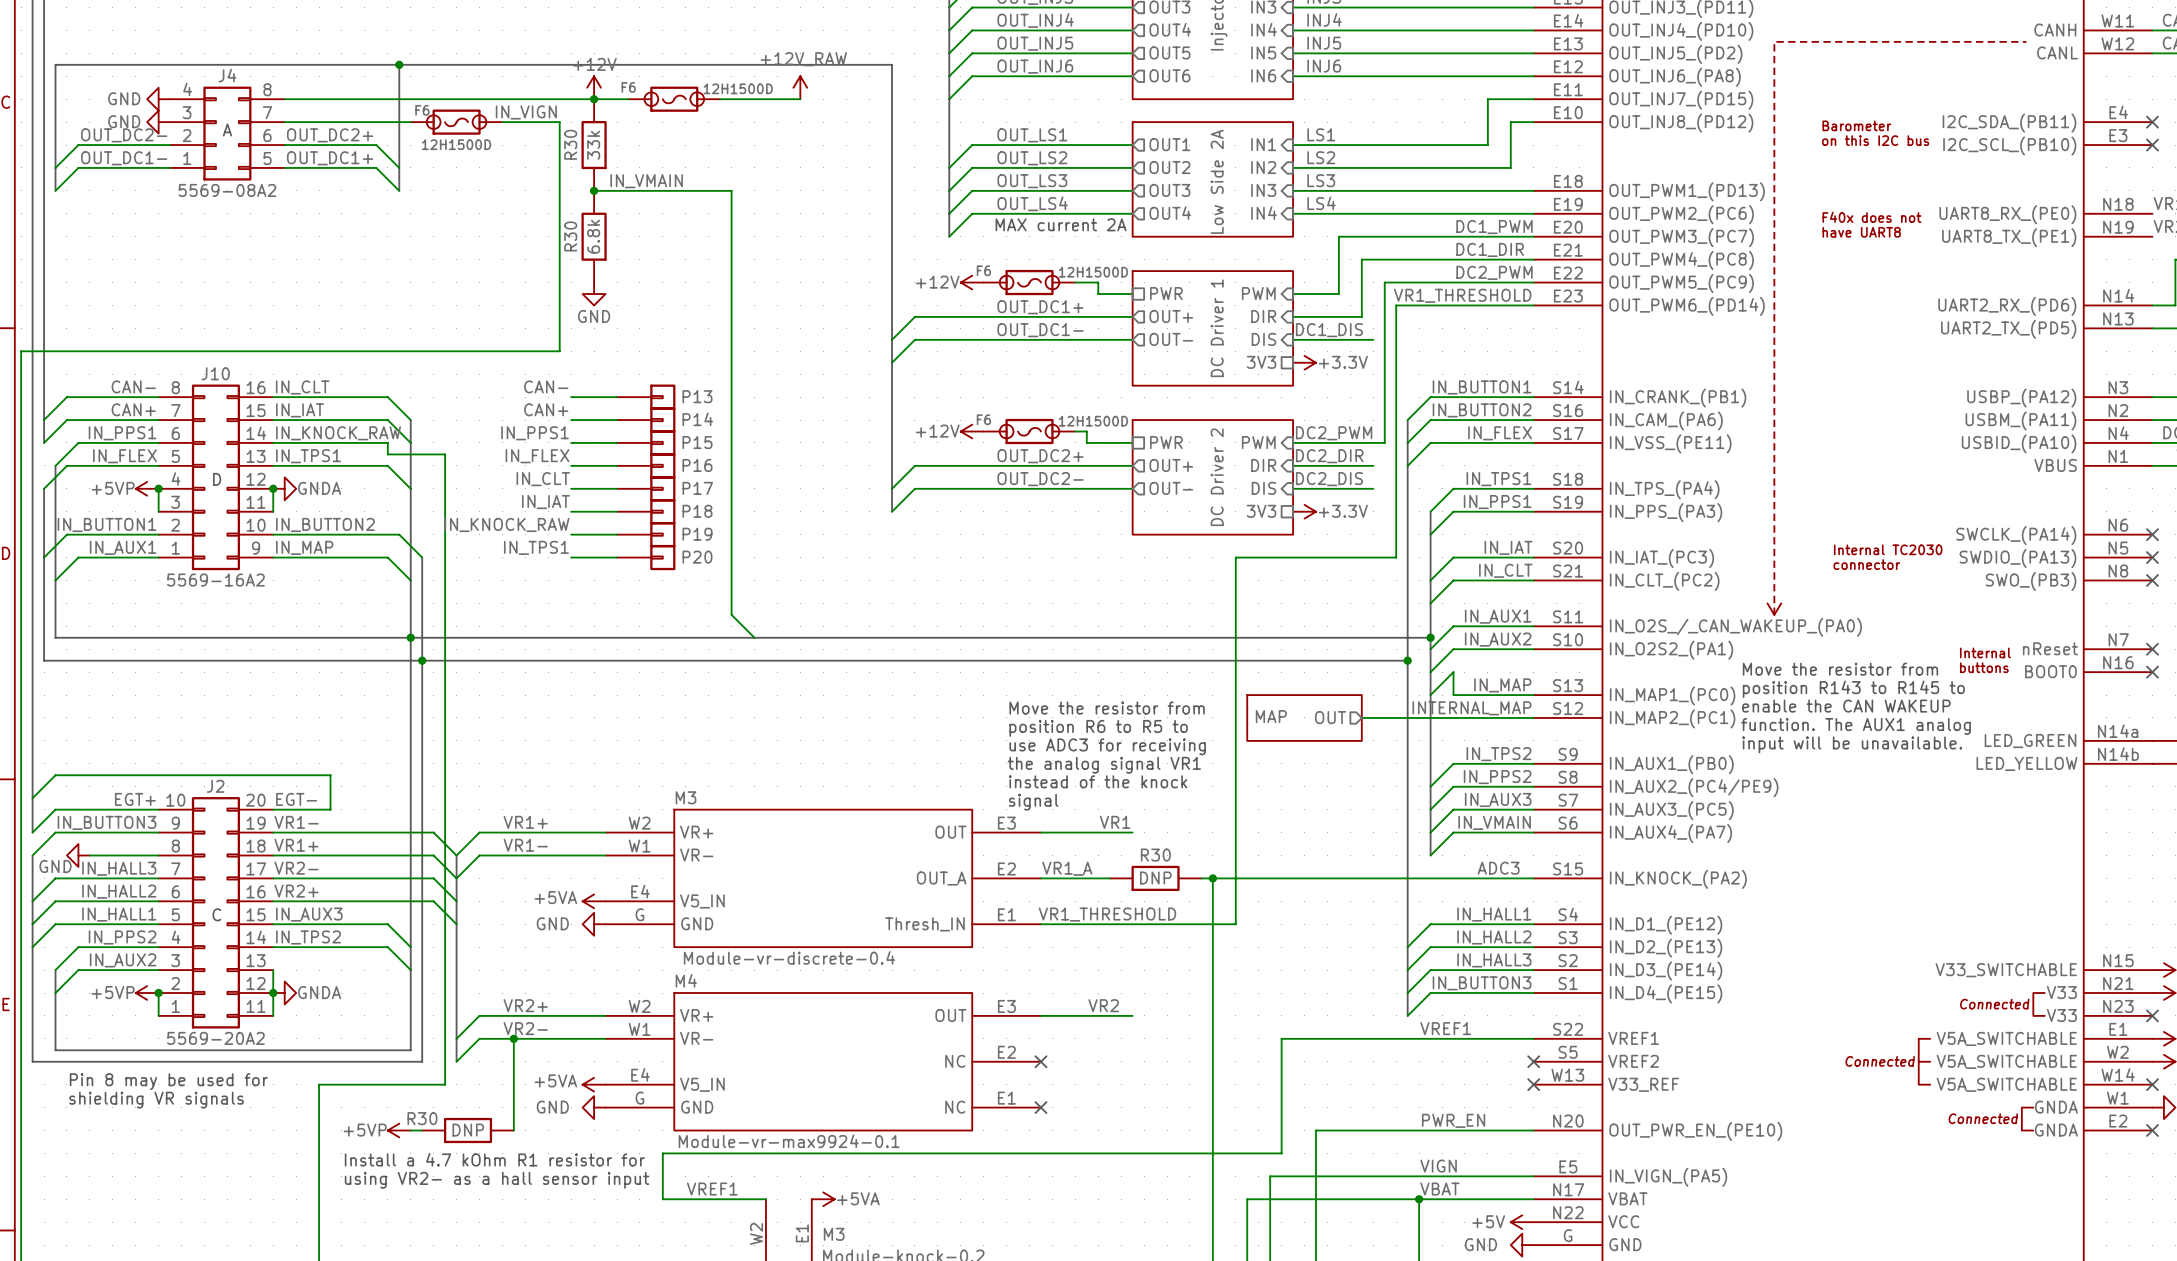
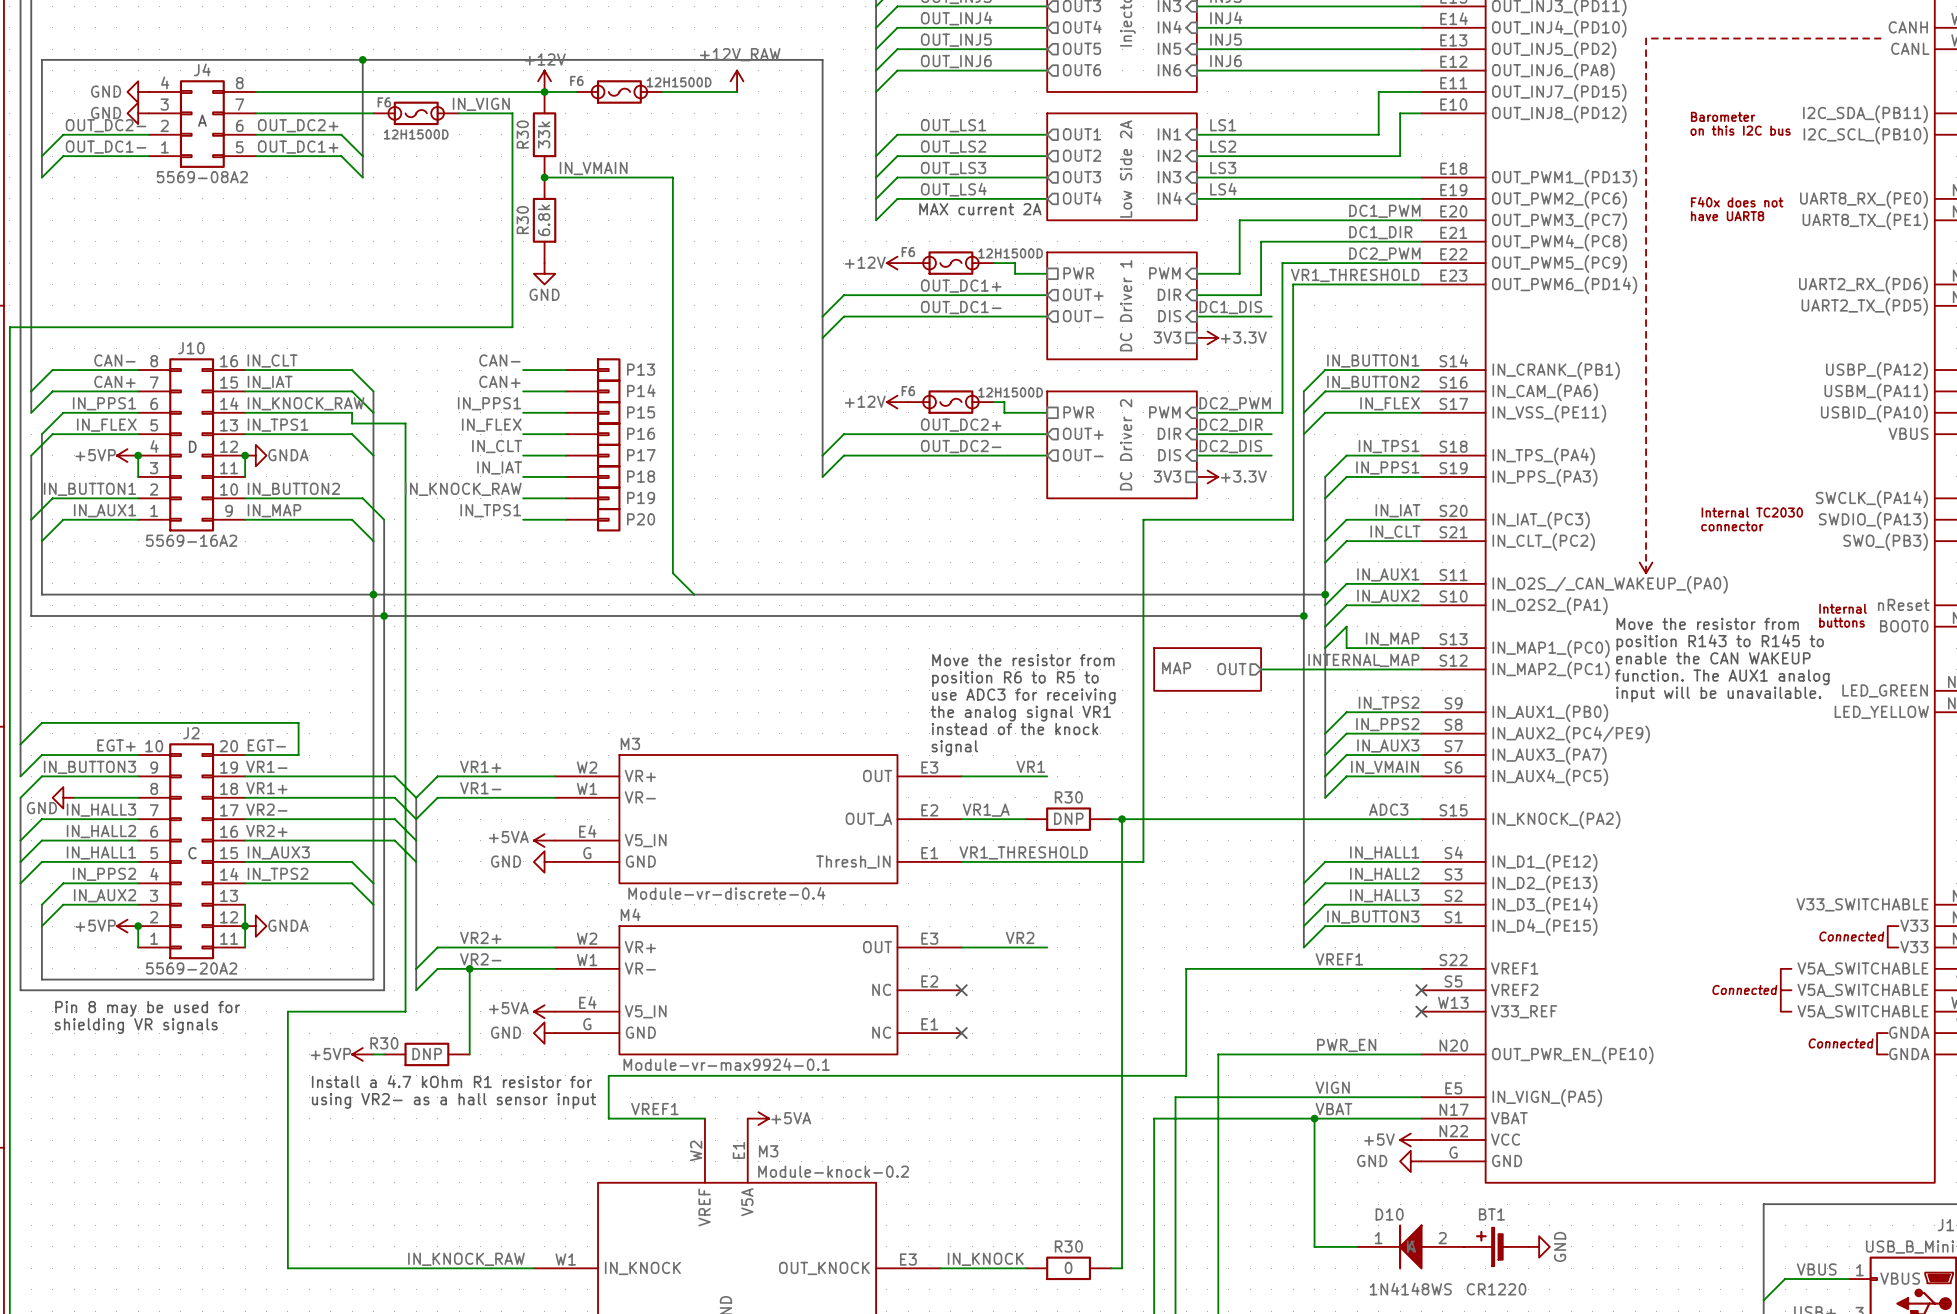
part pin name: IN_AUX3_(PC5) (1671, 810) -> IN_AUX3_(PA7) (1549, 755)
part pin name: IN_AUX4_(PA7) (1670, 833) -> IN_AUX4_(PC5) (1550, 777)

